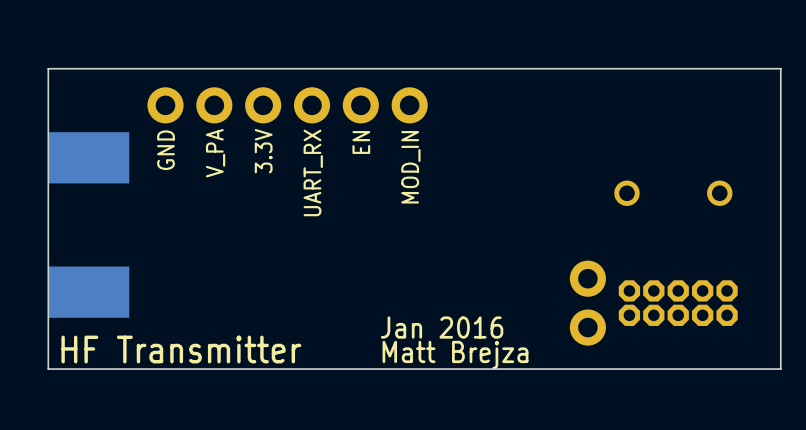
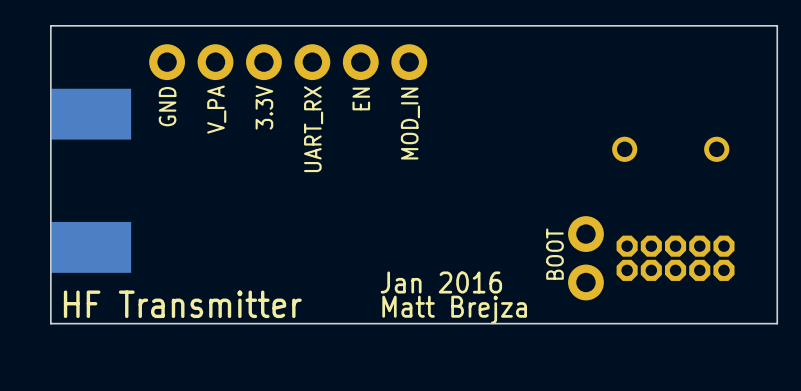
text: none -> BOOT (554, 254)

